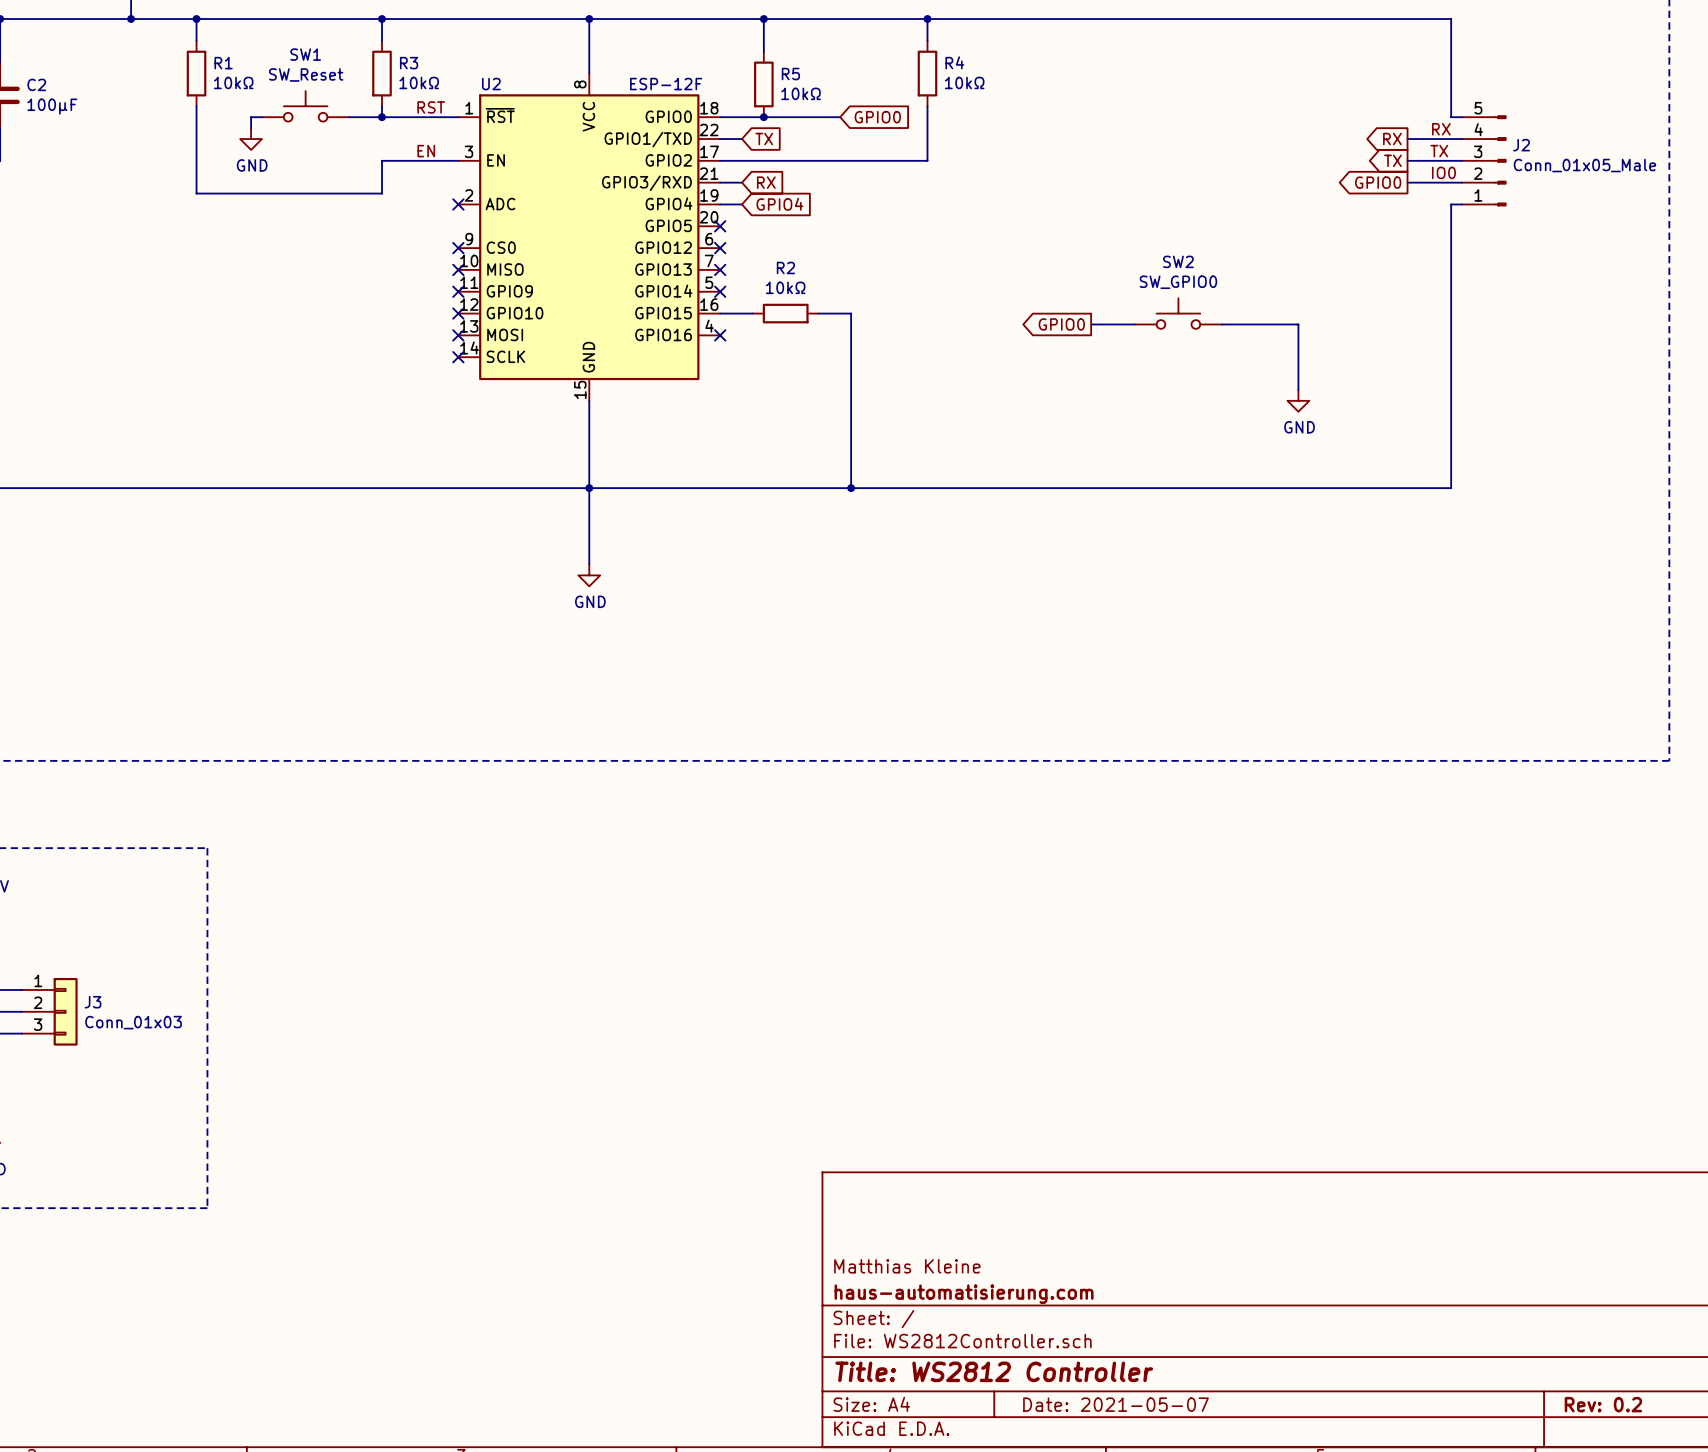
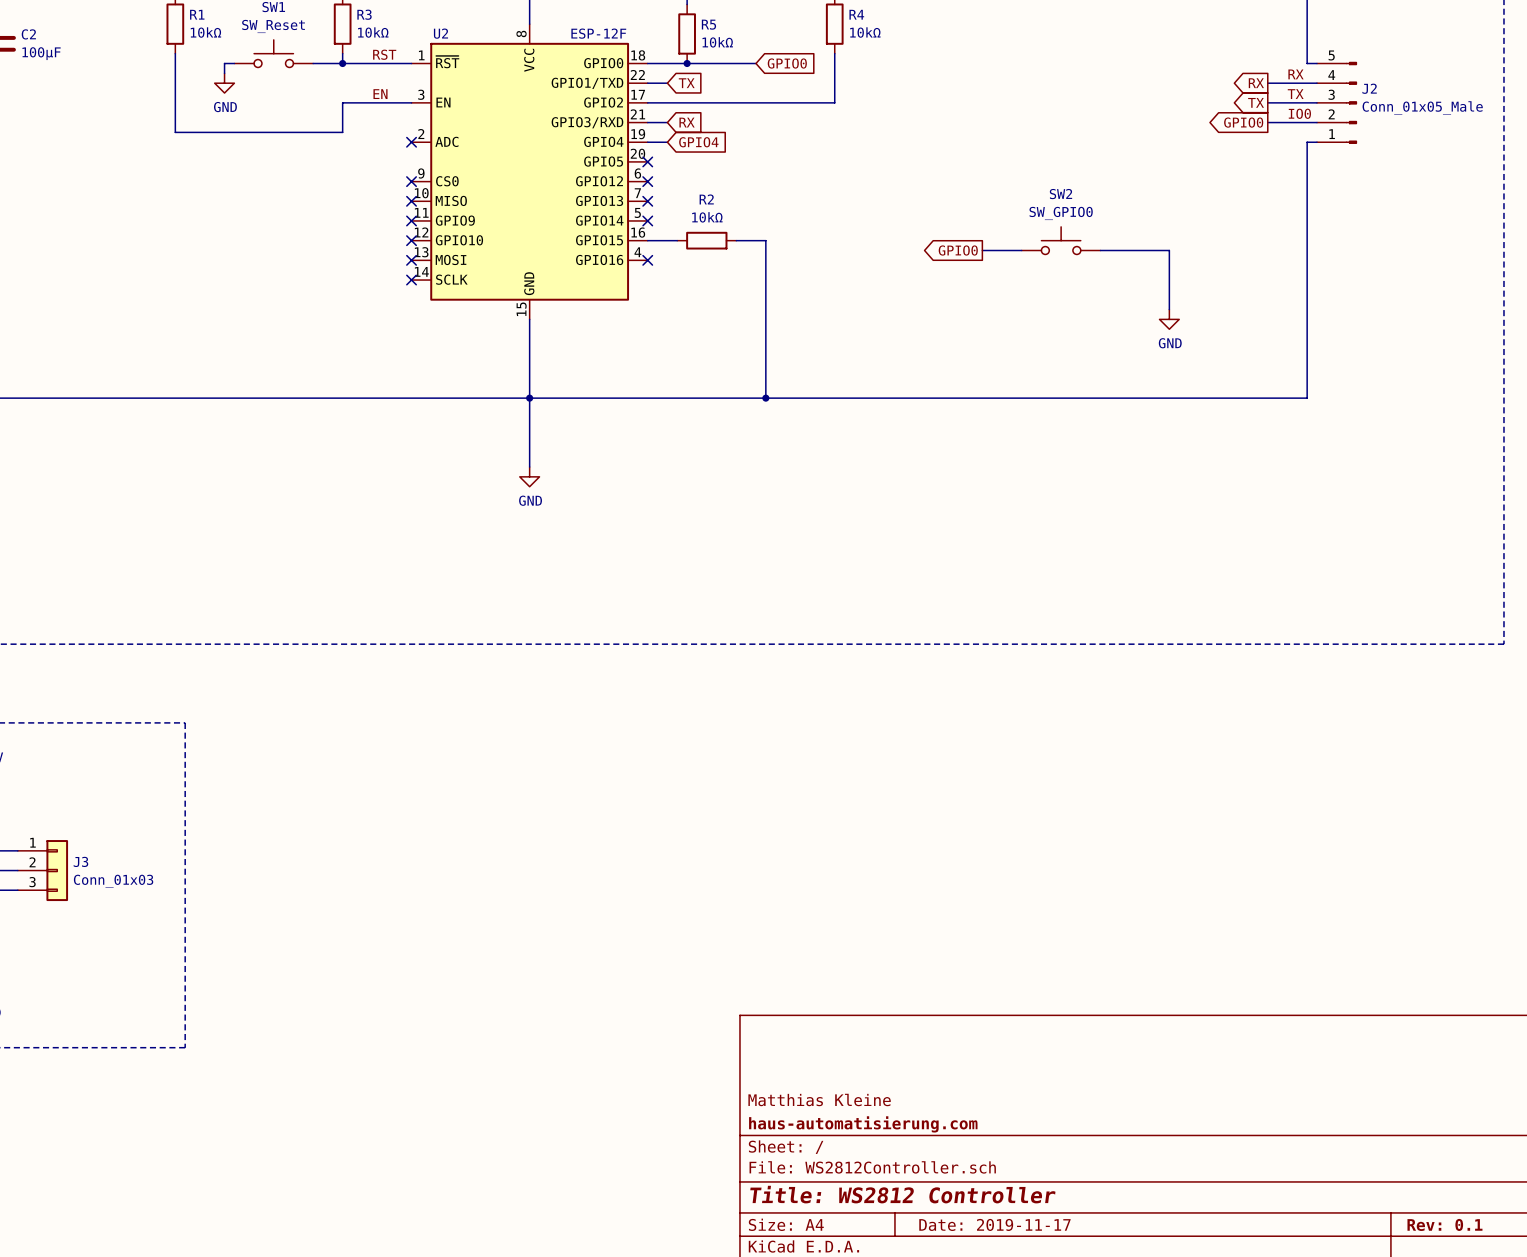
title block: Date: 2021-05-07 (1116, 1404) -> Date: 2019-11-17 (994, 1224)
title block: Rev: 0.2 (1603, 1404) -> Rev: 0.1 (1444, 1224)

